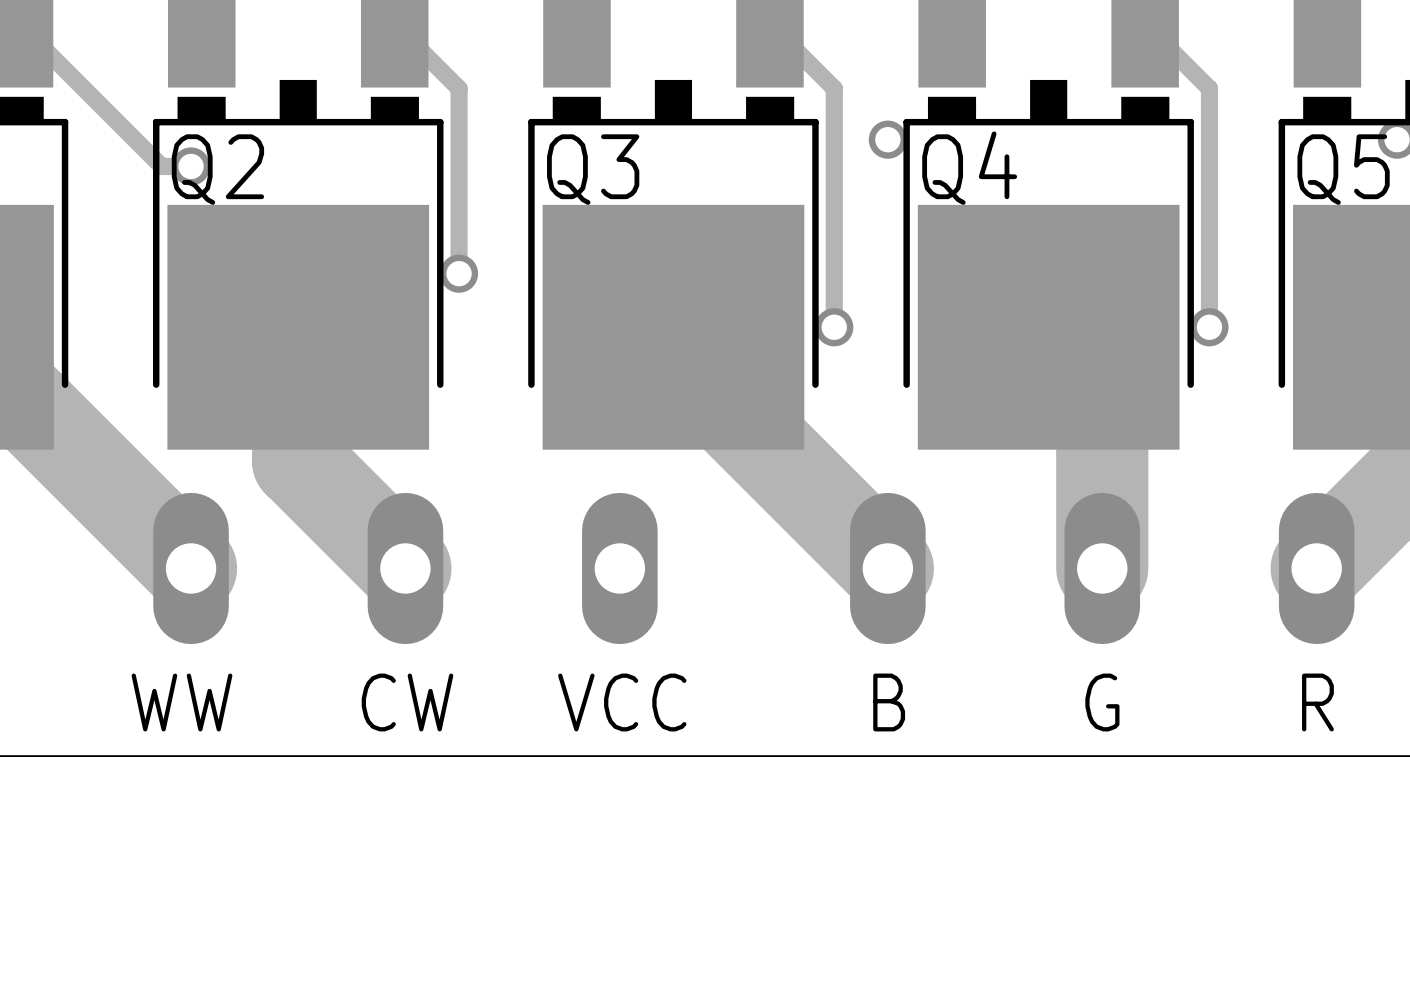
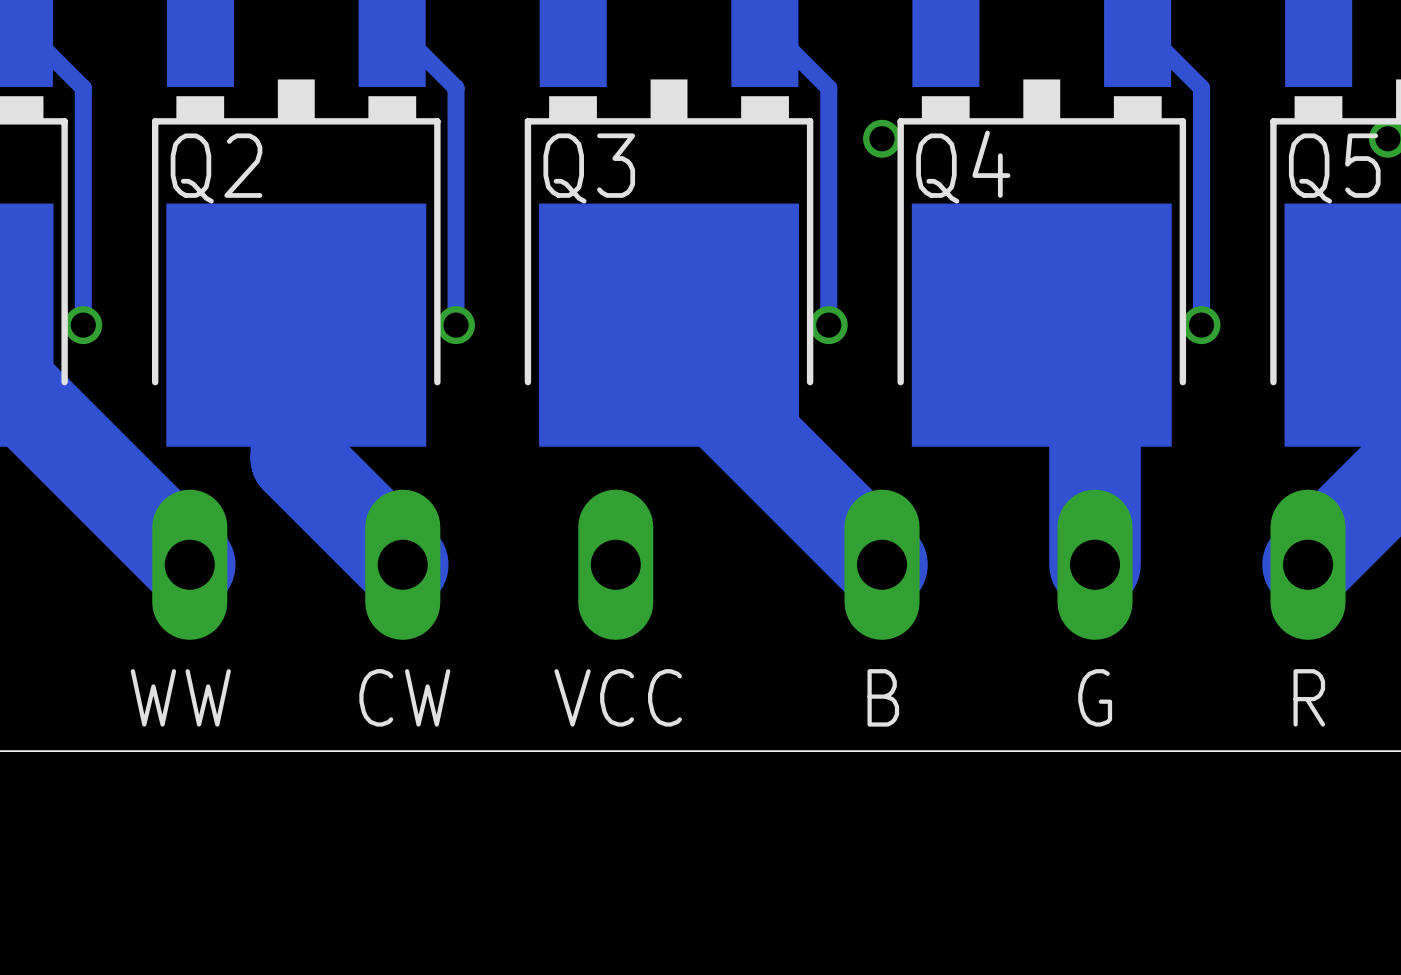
track: (83, 88) (161, 166) (191, 166) -> (83, 87) (83, 325)
via: (191, 166) -> none
track: none -> (456, 271) (456, 325)
via position: (459, 273) -> (456, 325)
via: none -> (83, 325)

